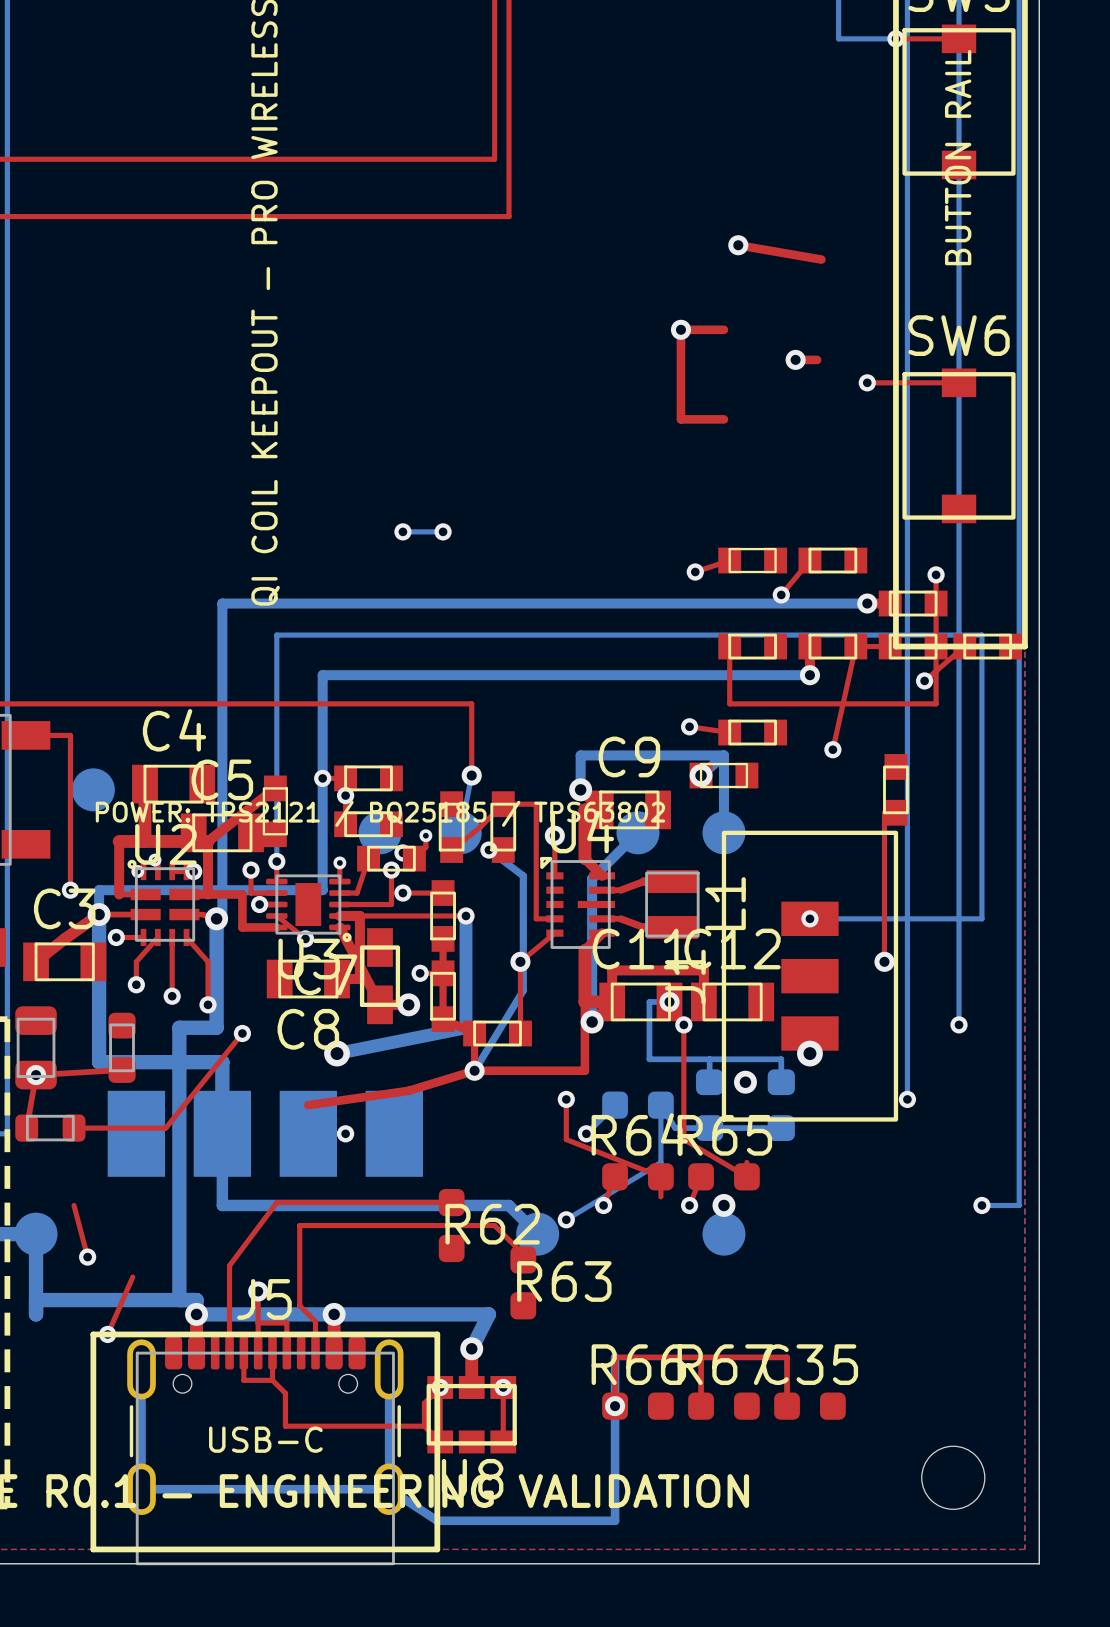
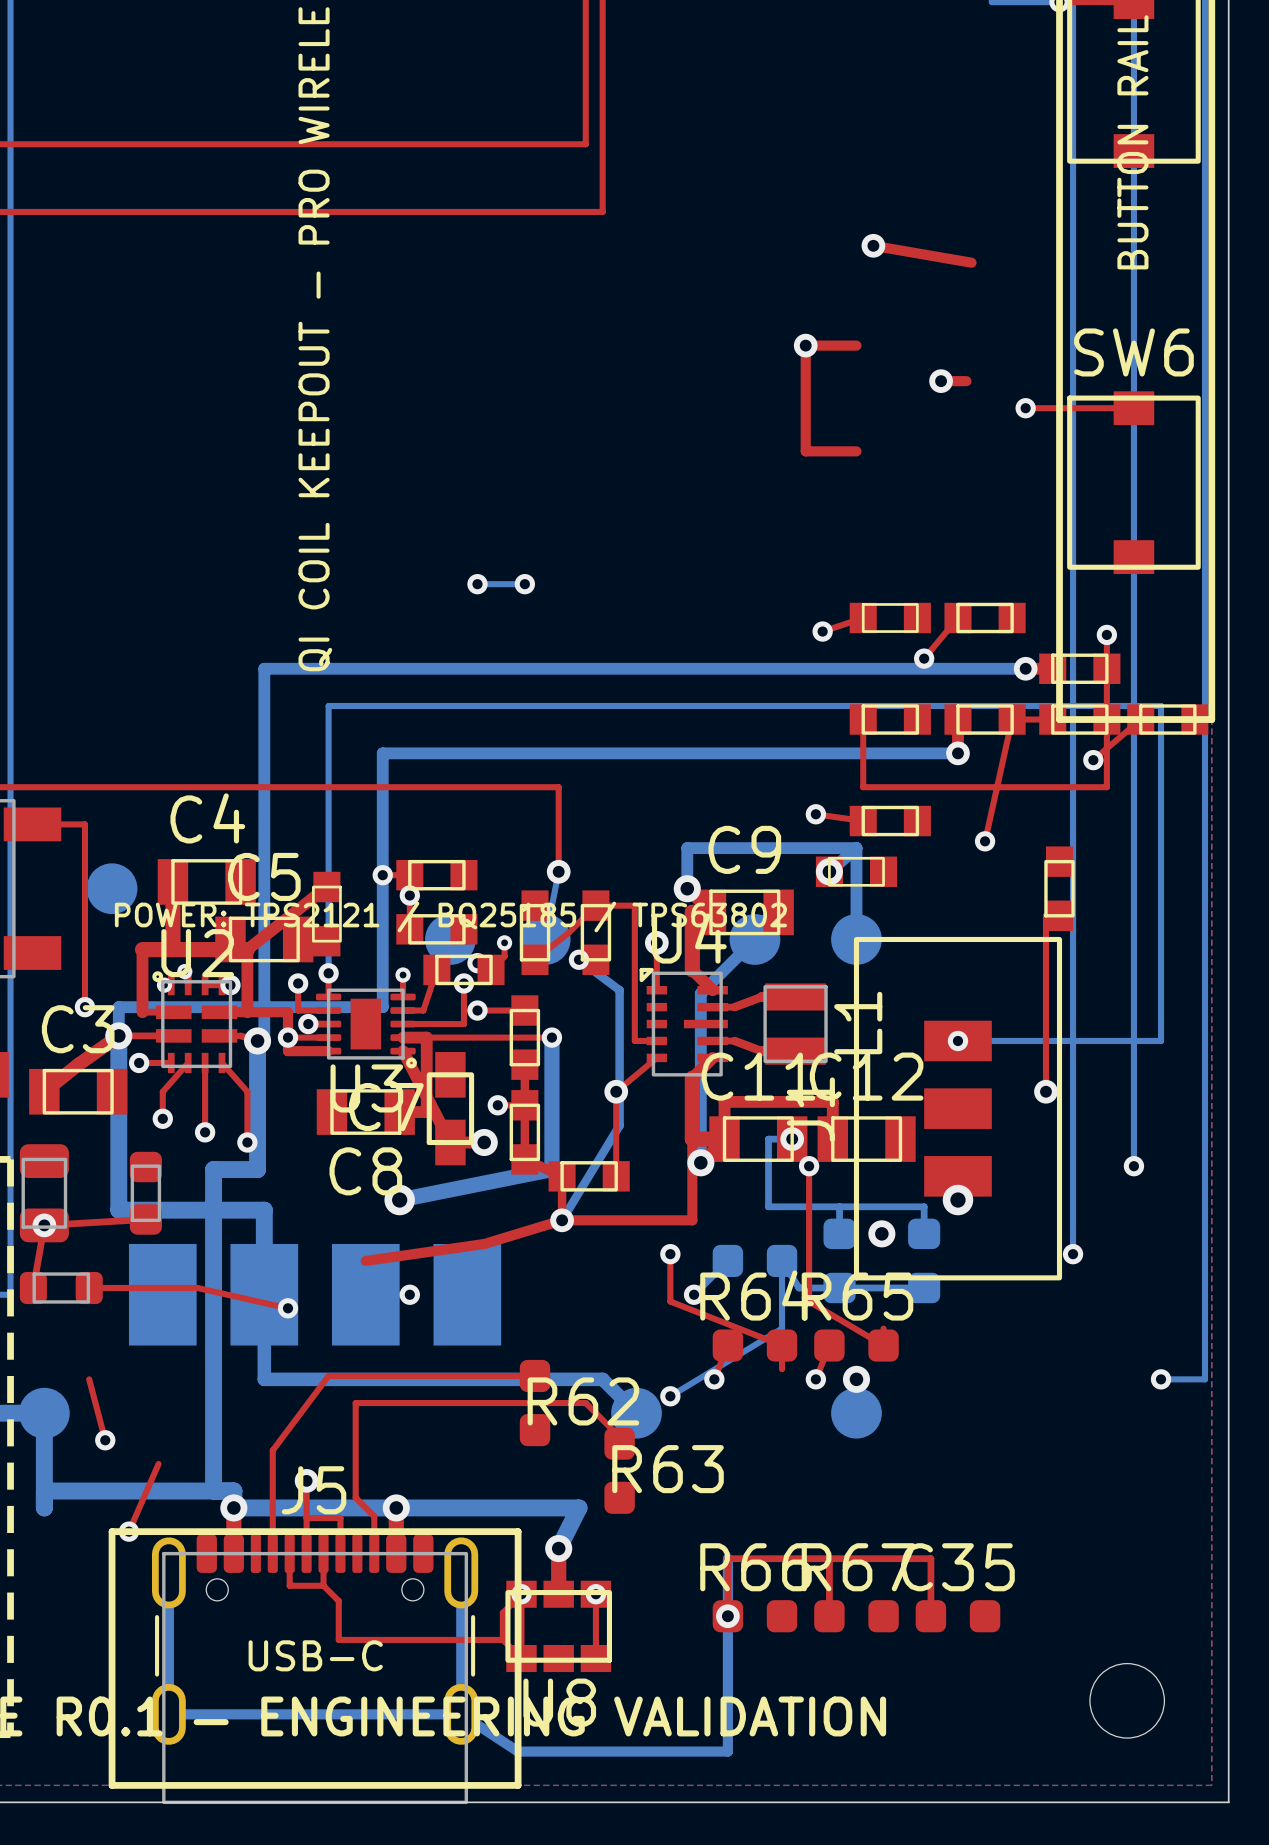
via: none -> (288, 1037)
top track: (276, 915) (305, 938) -> (328, 1037) (288, 1037)
via: (305, 938) -> none
top track: (242, 1033) (165, 1128) -> (288, 1308) (197, 1288)
via: (242, 1033) -> none
via: none -> (288, 1308)

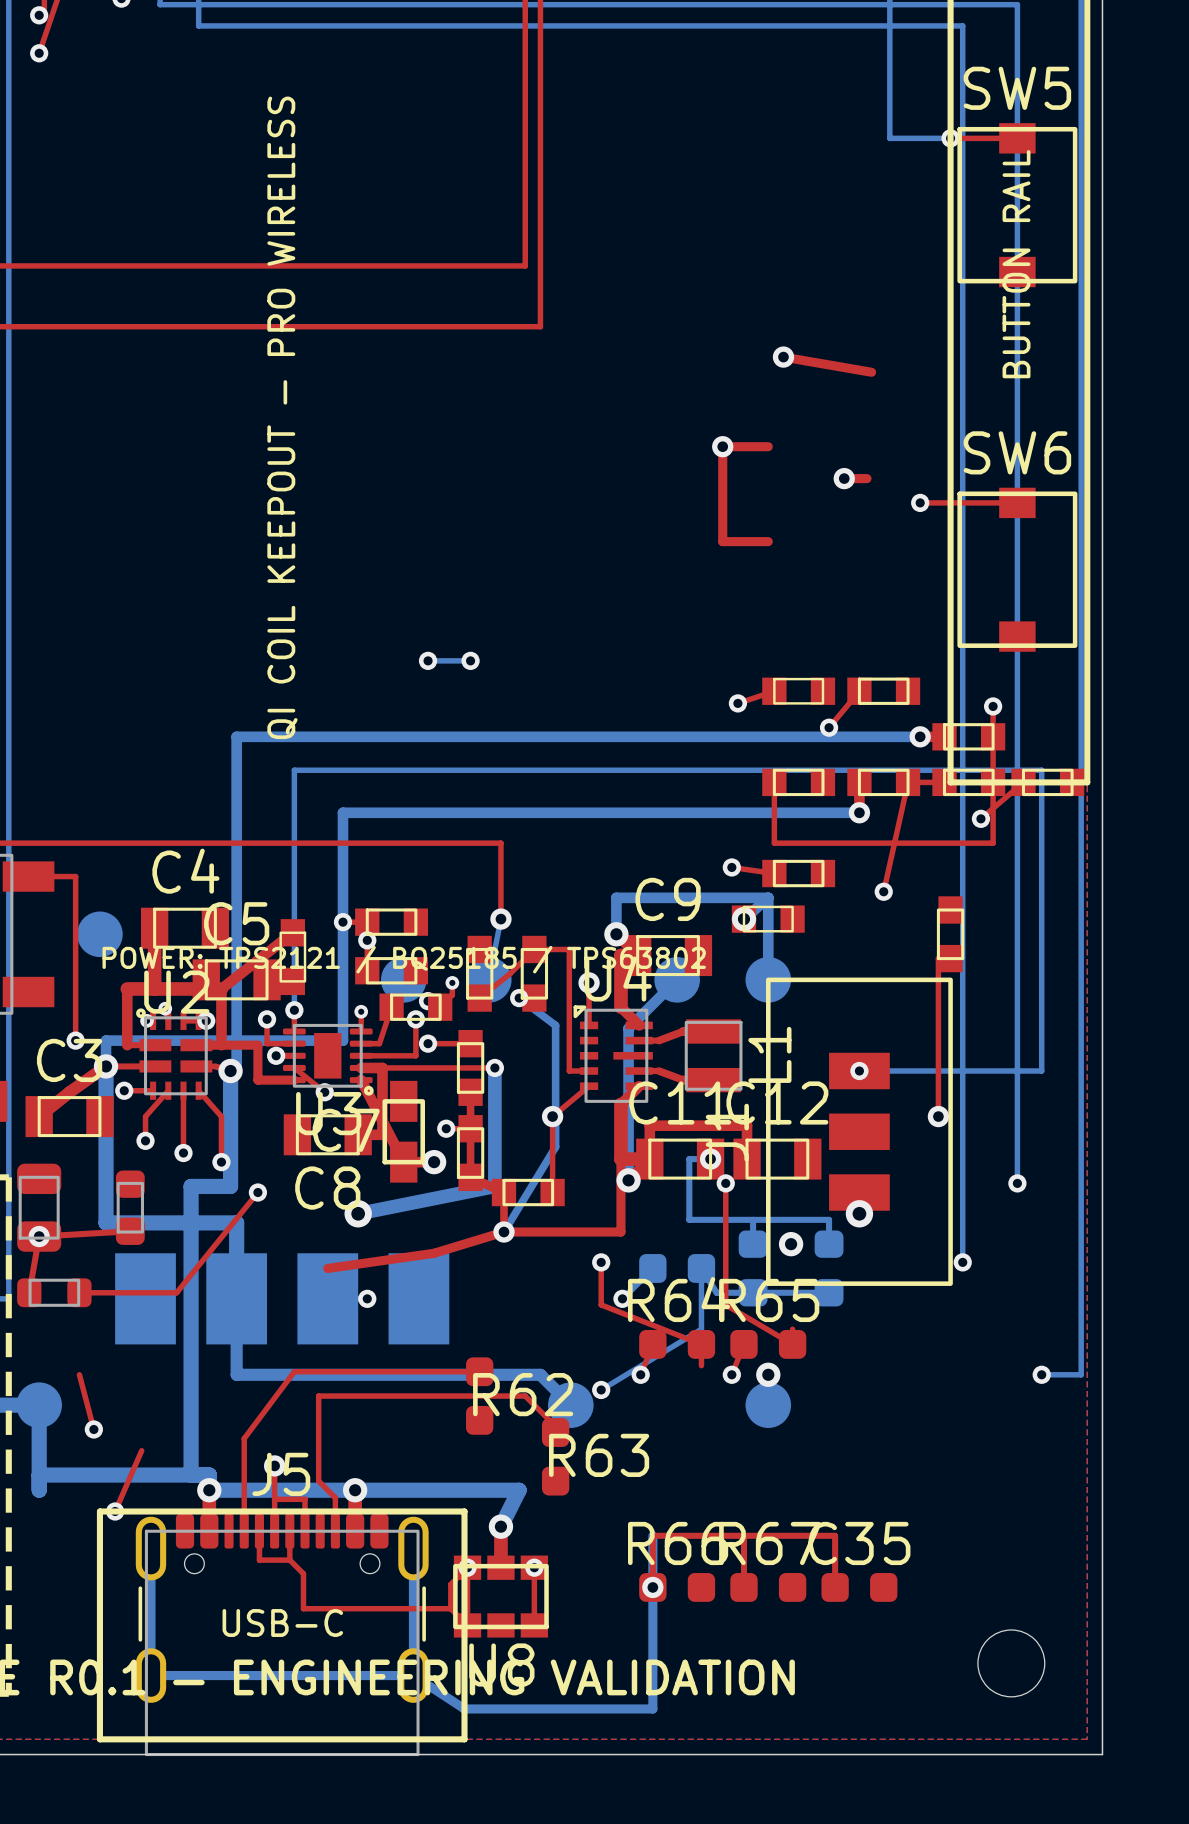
top track: (288, 1037) (328, 1037) -> (324, 1092) (294, 1067)
via: (288, 1037) -> none
via: none -> (324, 1092)
via: none -> (257, 1192)
top track: (197, 1288) (288, 1308) -> (176, 1292) (257, 1192)
via: (288, 1308) -> none

